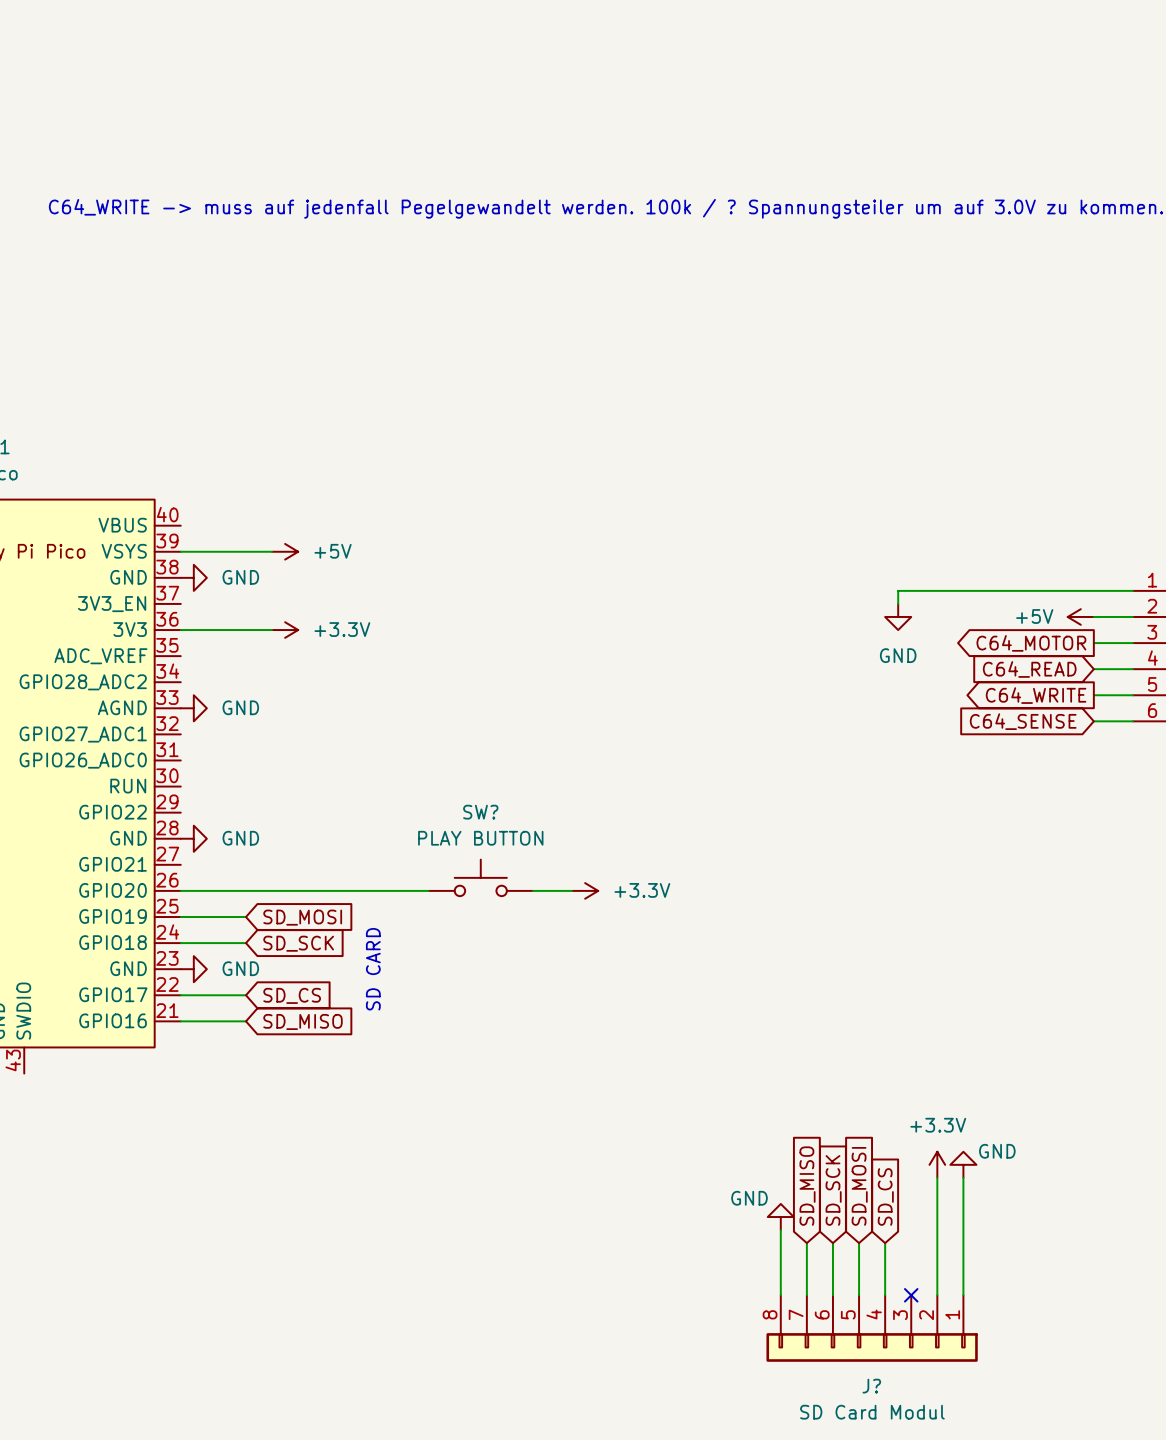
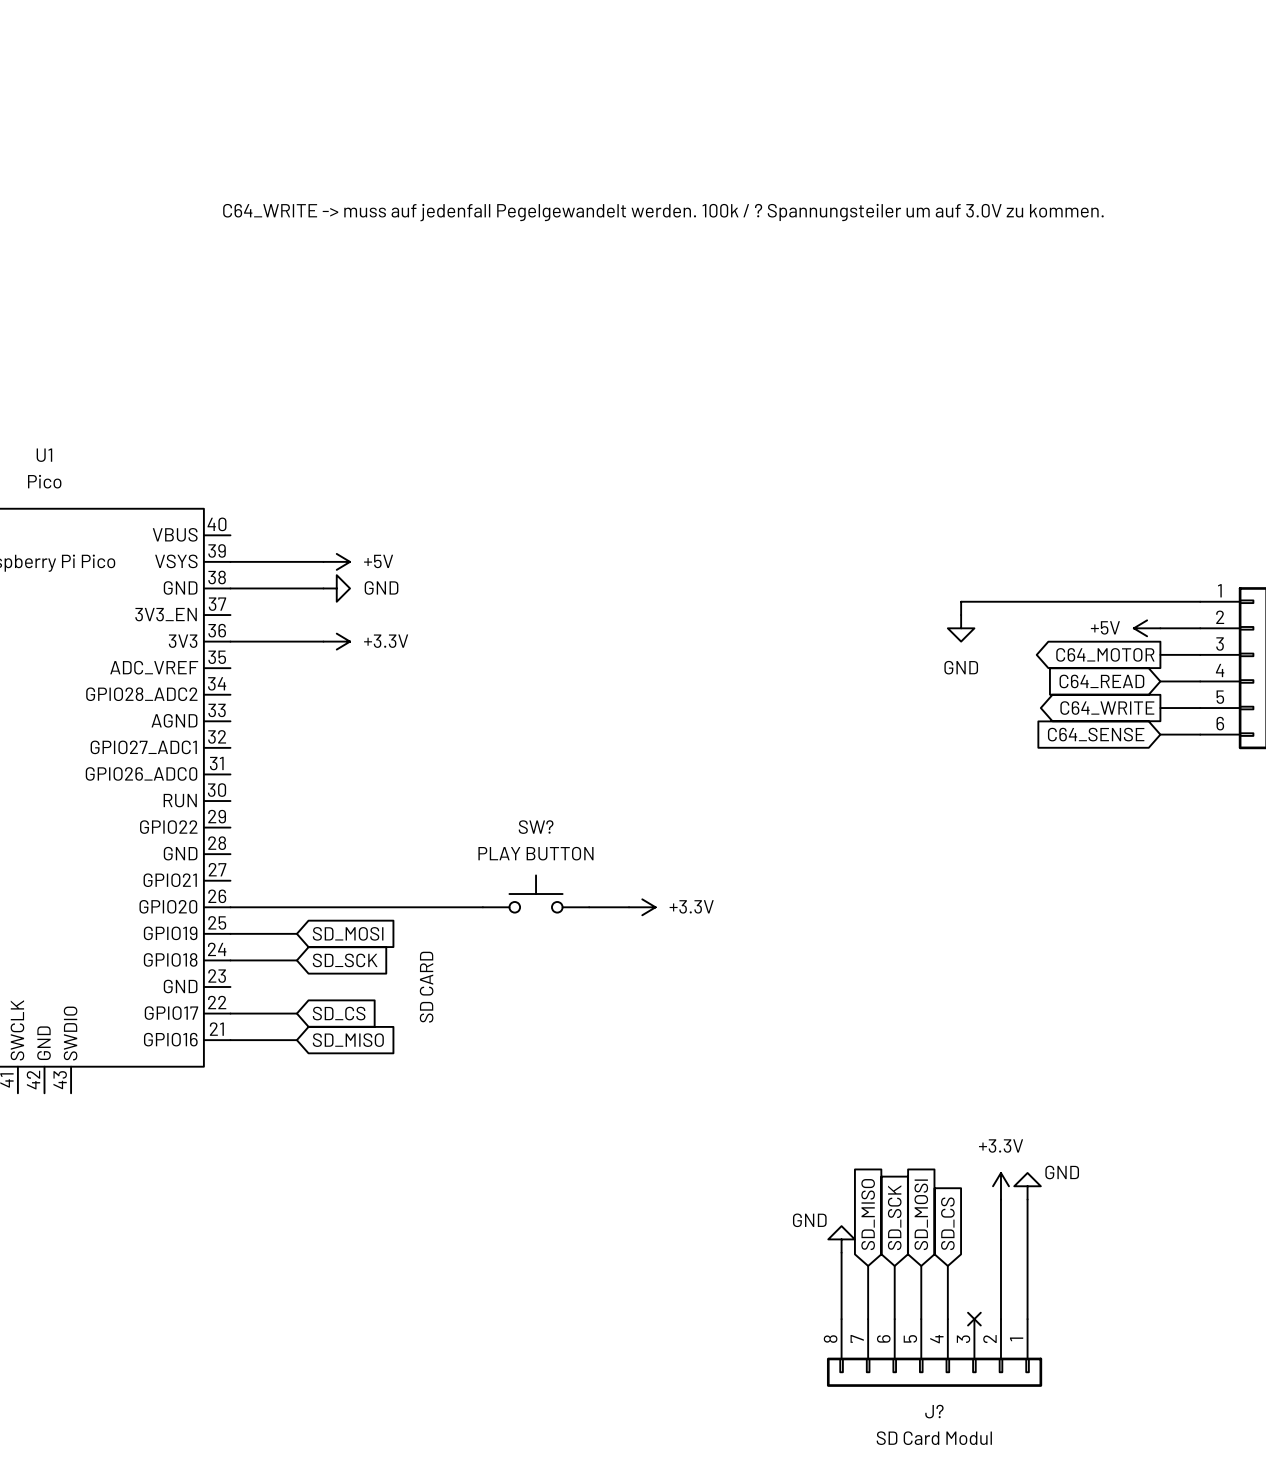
wire: none -> (230, 588) (323, 588)
power symbol: GND (193, 577) -> none
power symbol: none -> GND (336, 588)
power symbol: GND (193, 708) -> none
power symbol: GND (193, 838) -> none
power symbol: GND (193, 969) -> none

